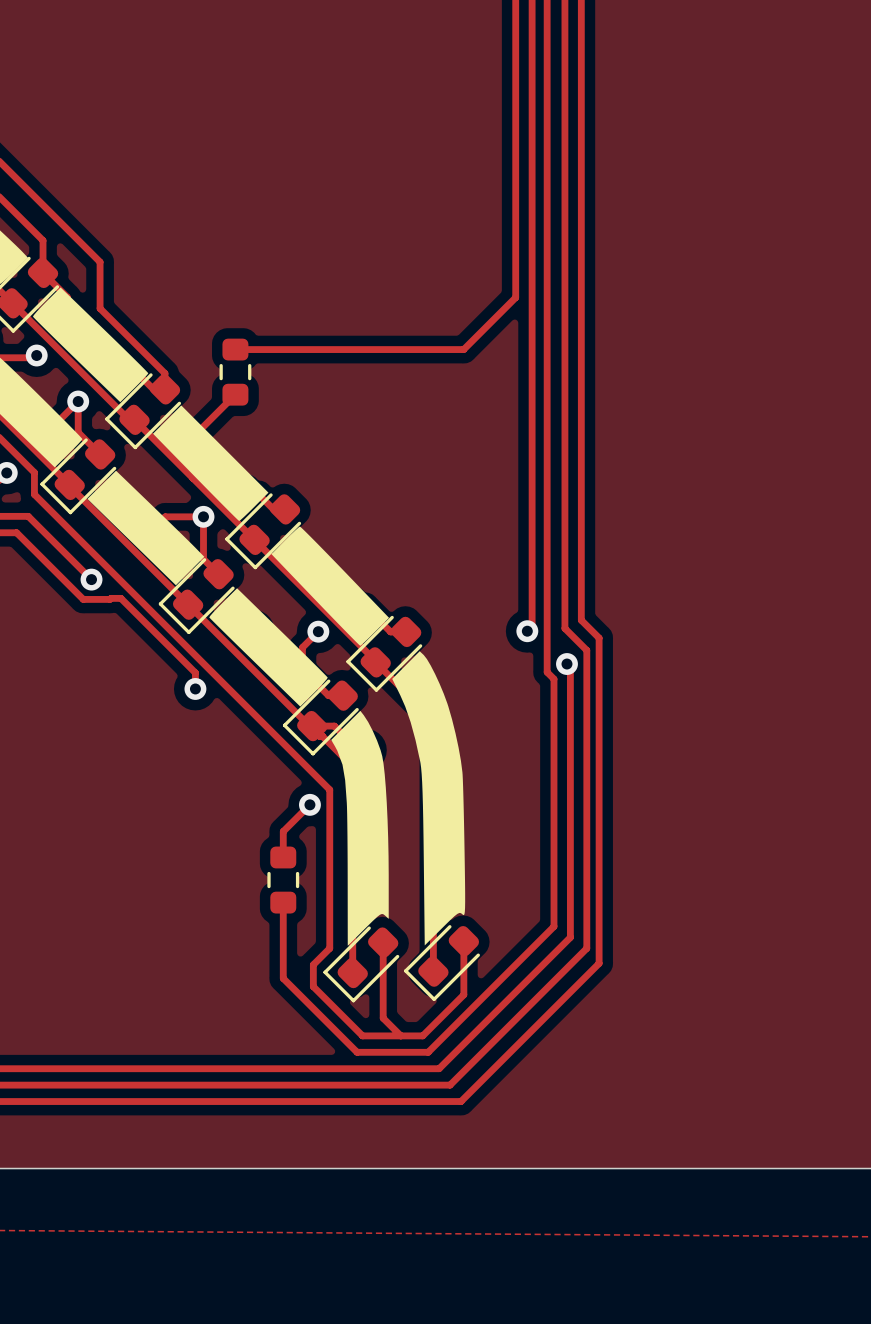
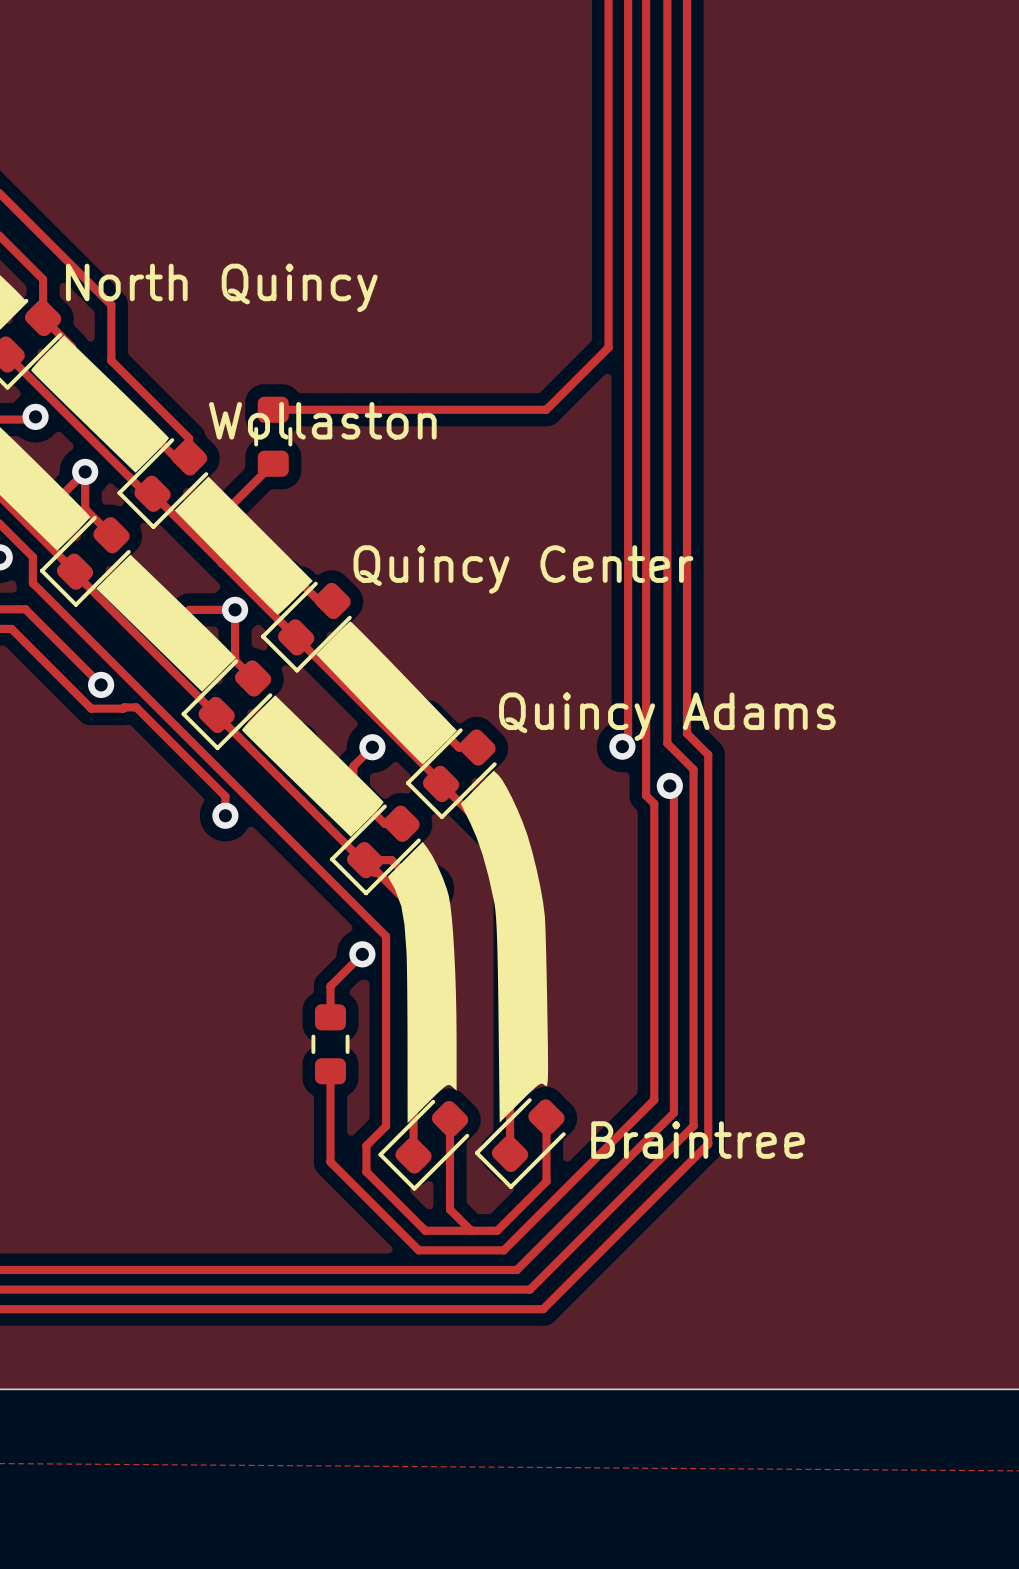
text: none -> North Quincy (221, 287)
text: none -> Wollaston (322, 420)
text: none -> Quincy Center (523, 569)
text: none -> Quincy Adams (667, 716)
text: none -> Braintree (698, 1140)

